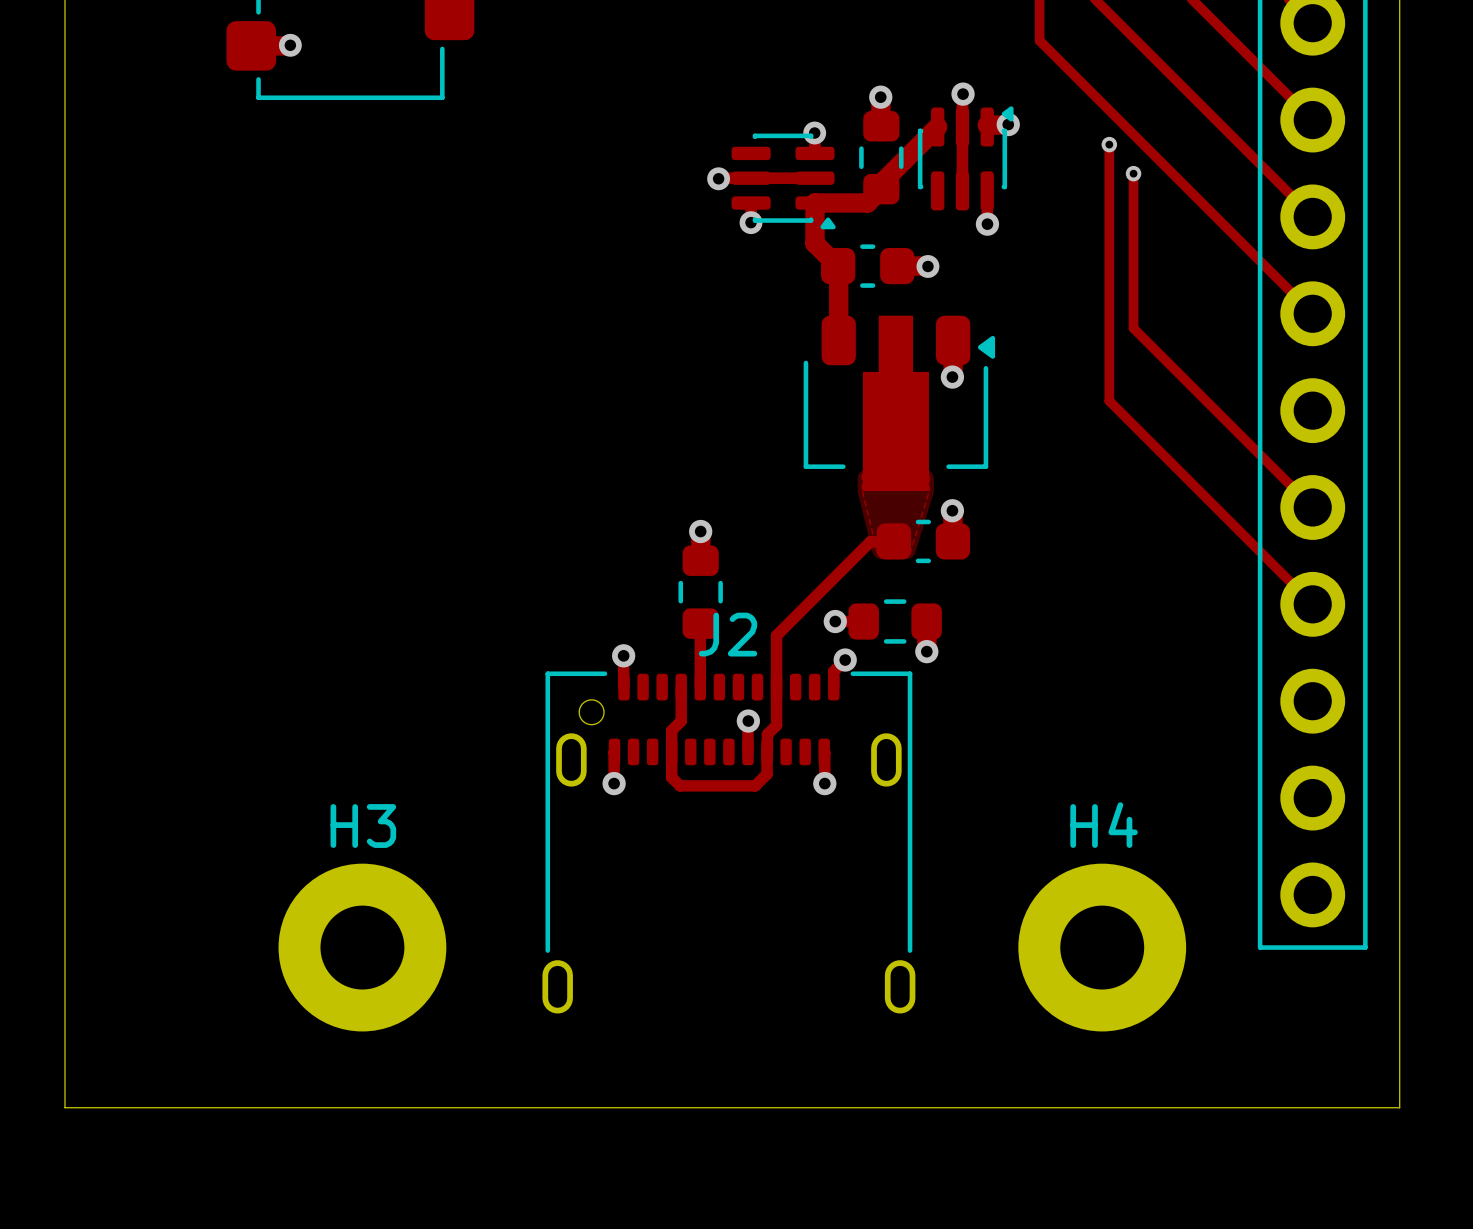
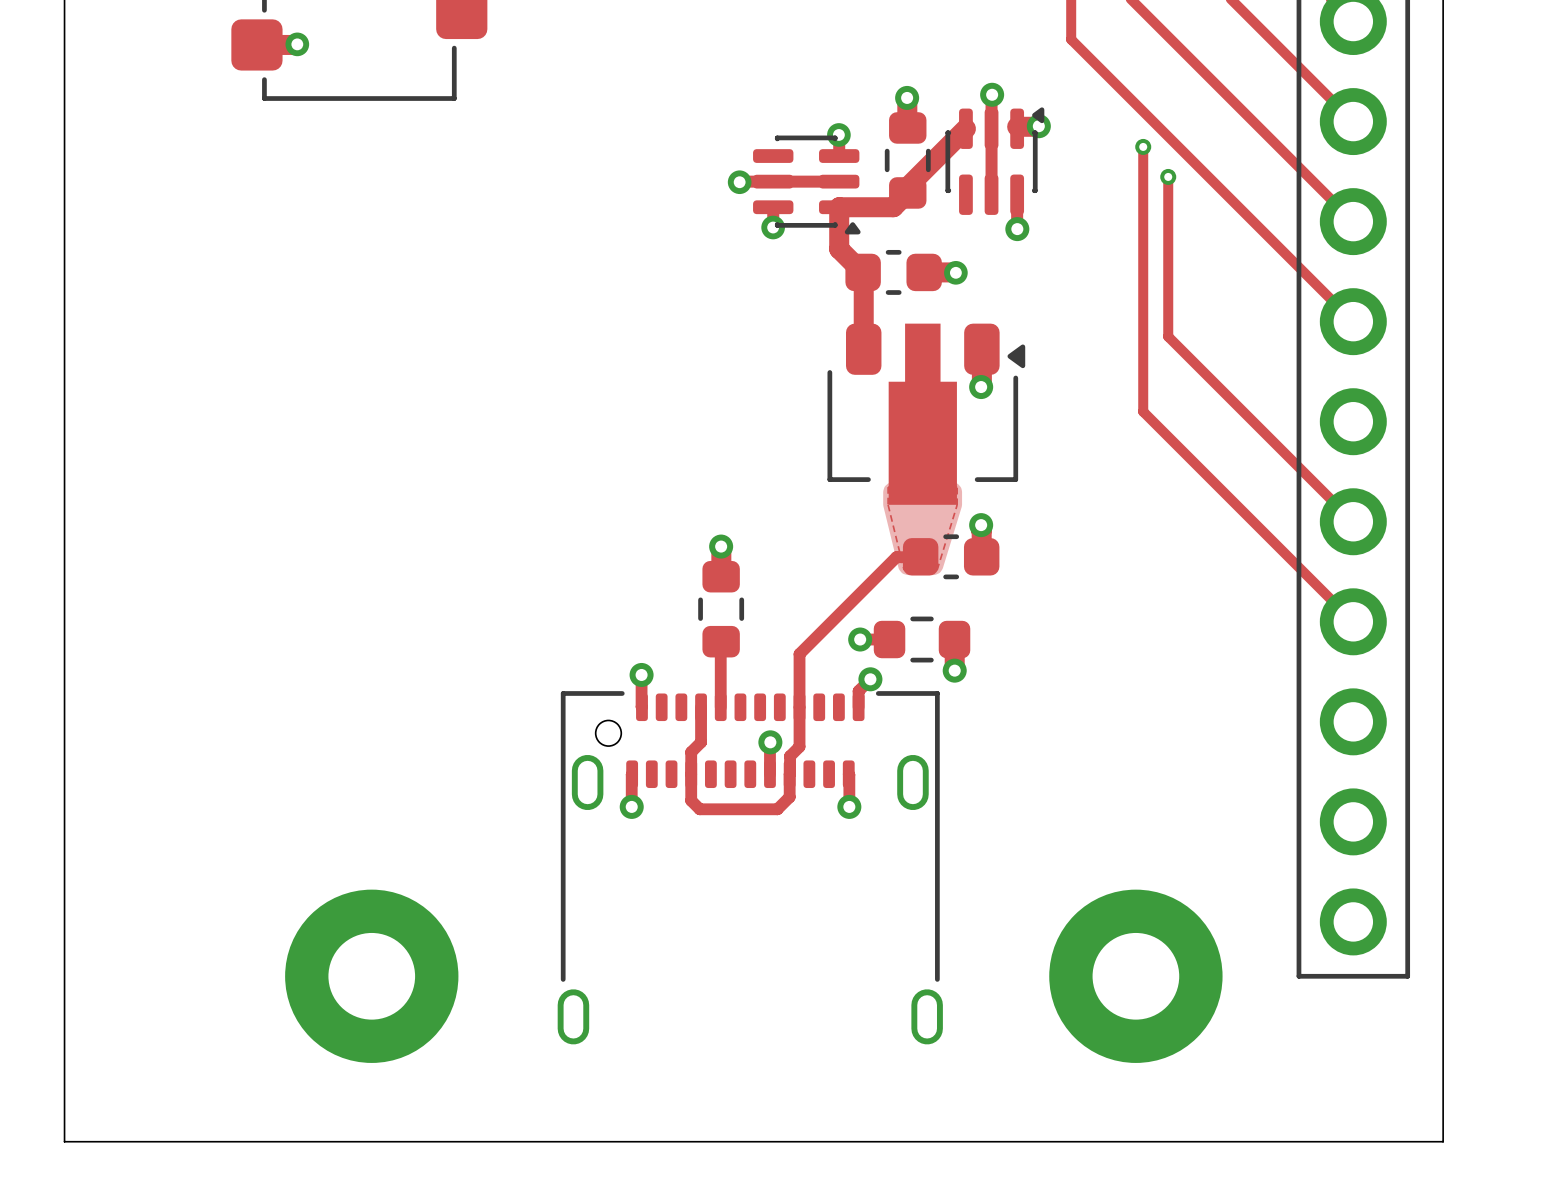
J2 name: J2 (727, 634) -> none
H4 name: H4 (1104, 825) -> none
H3 name: H3 (363, 826) -> none

